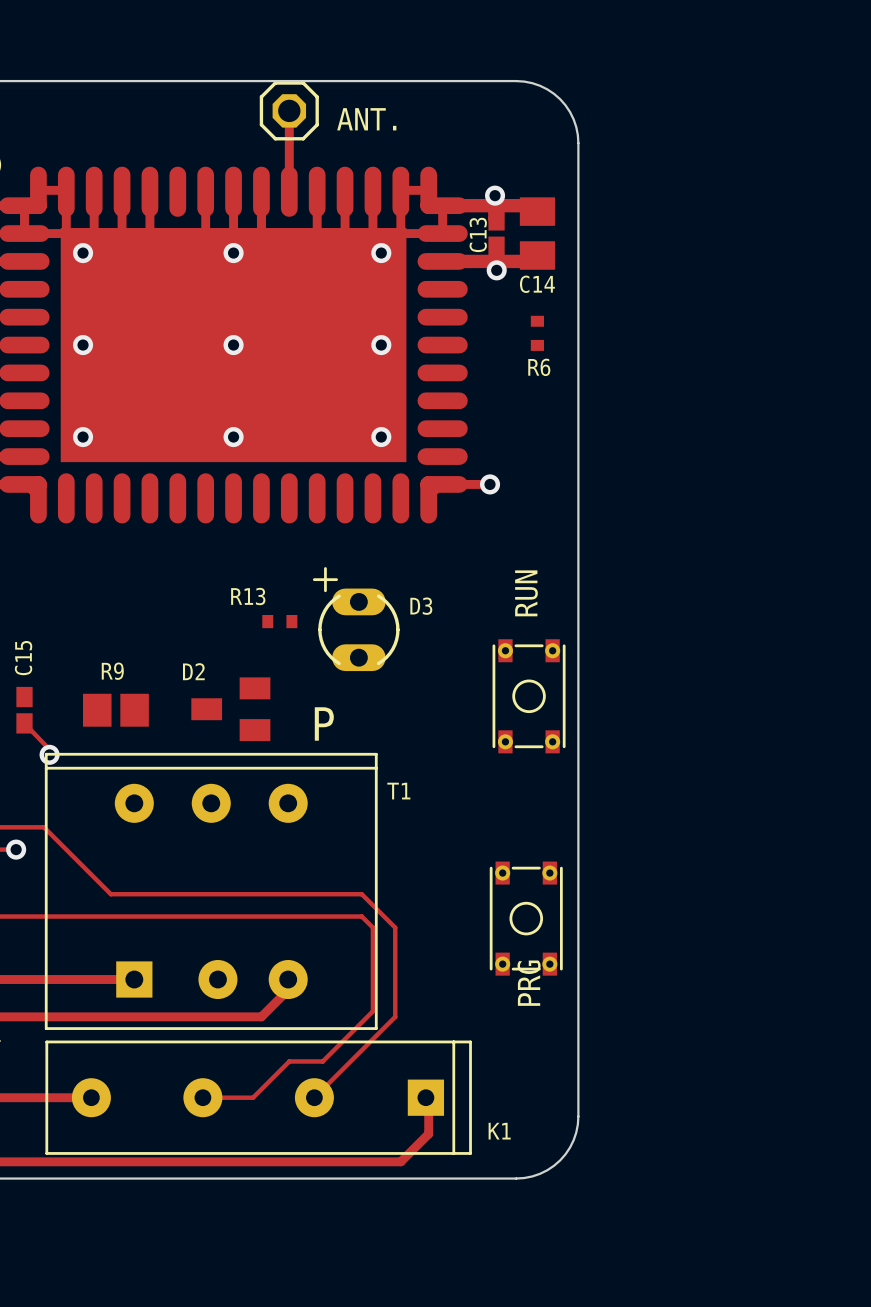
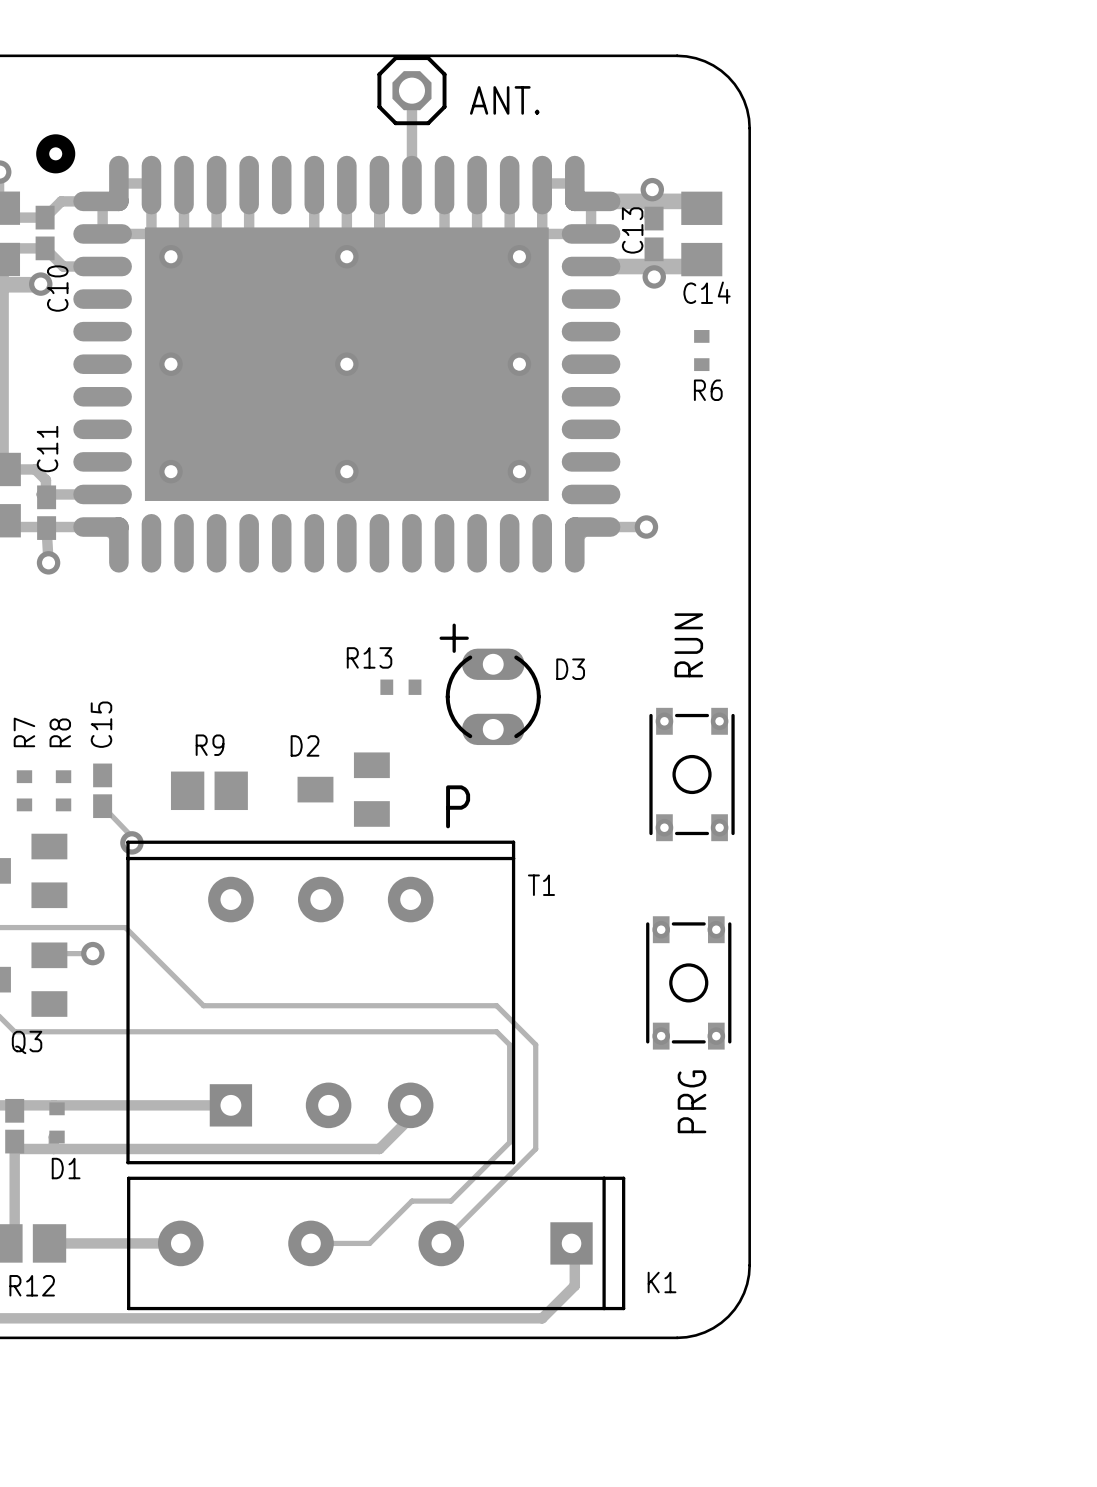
part position: (526, 918) -> (688, 982)

